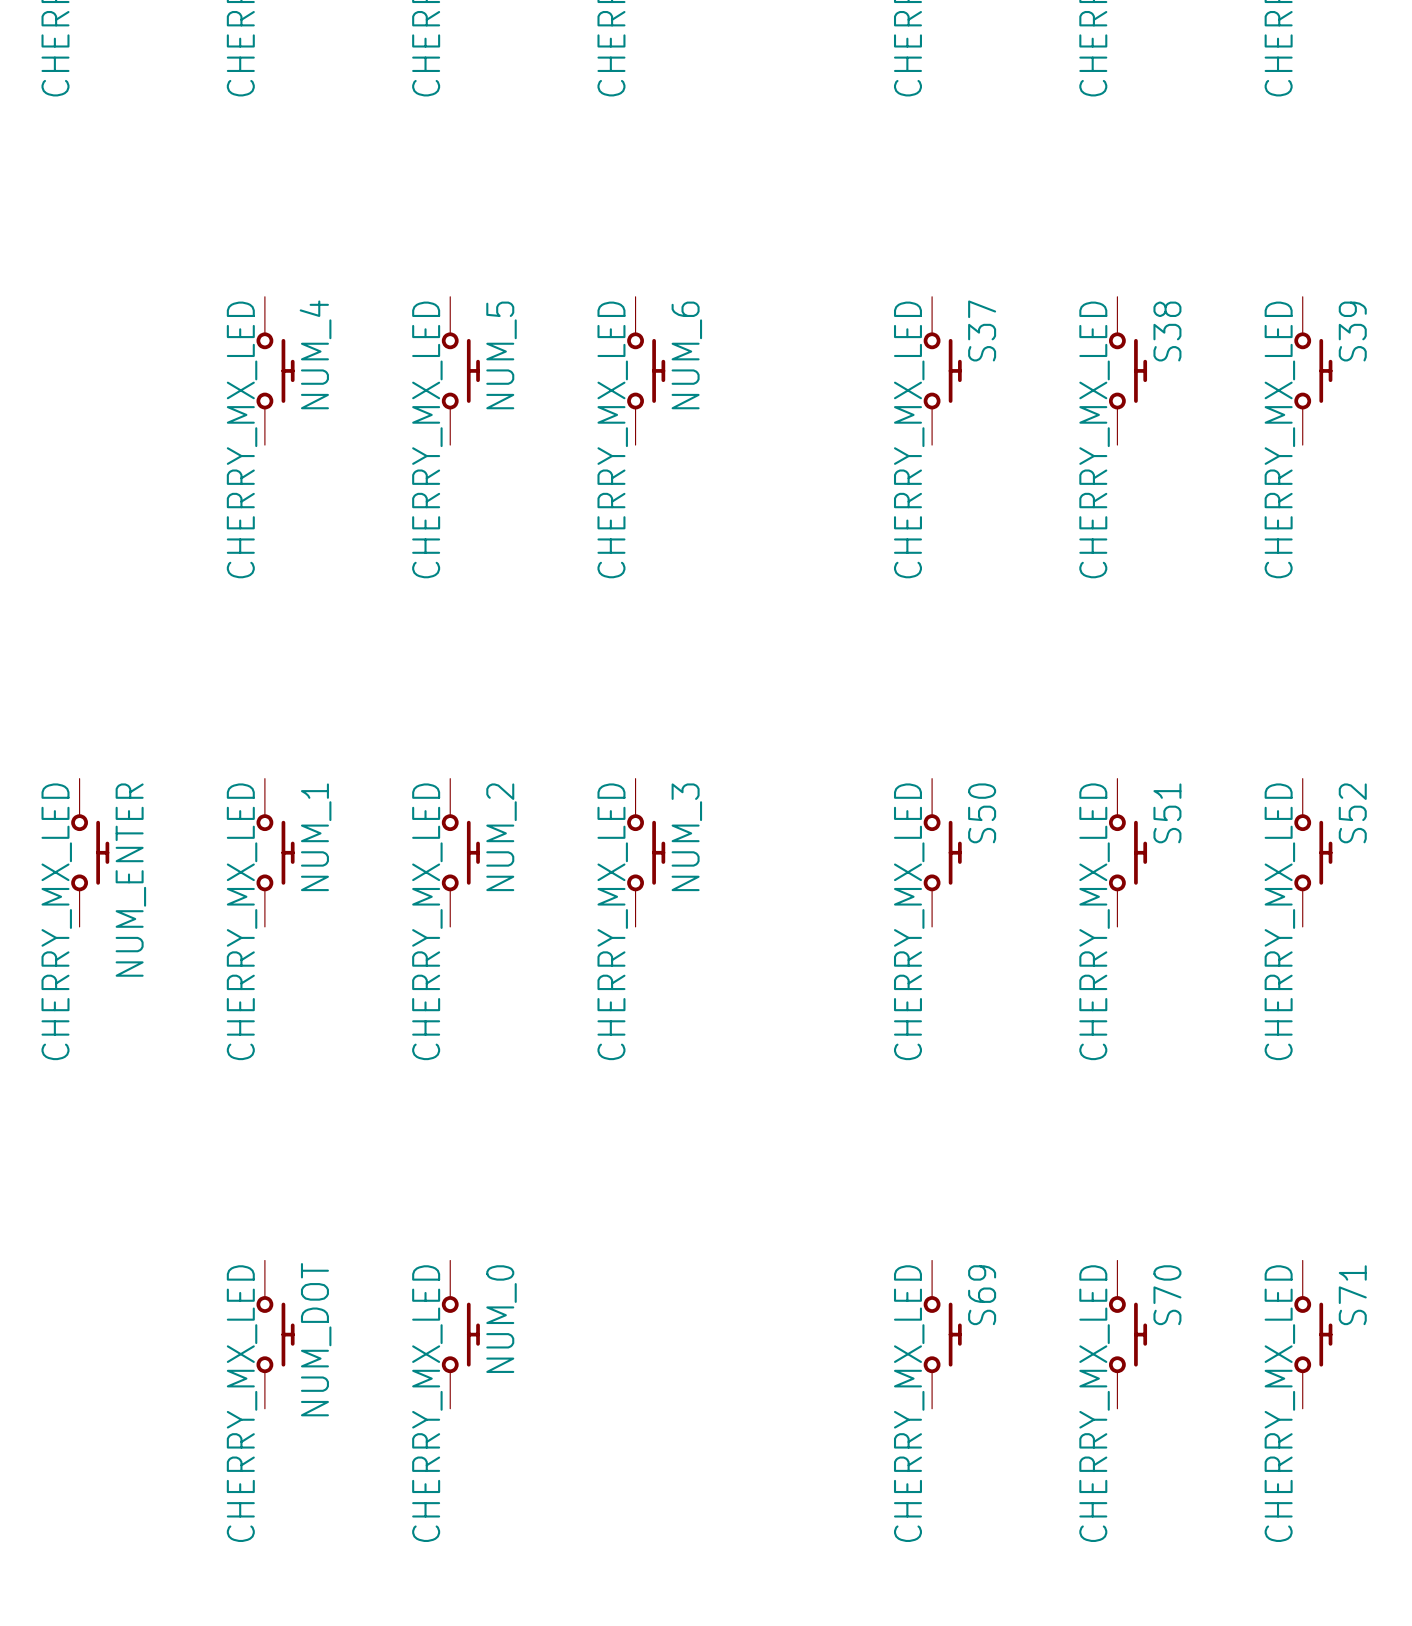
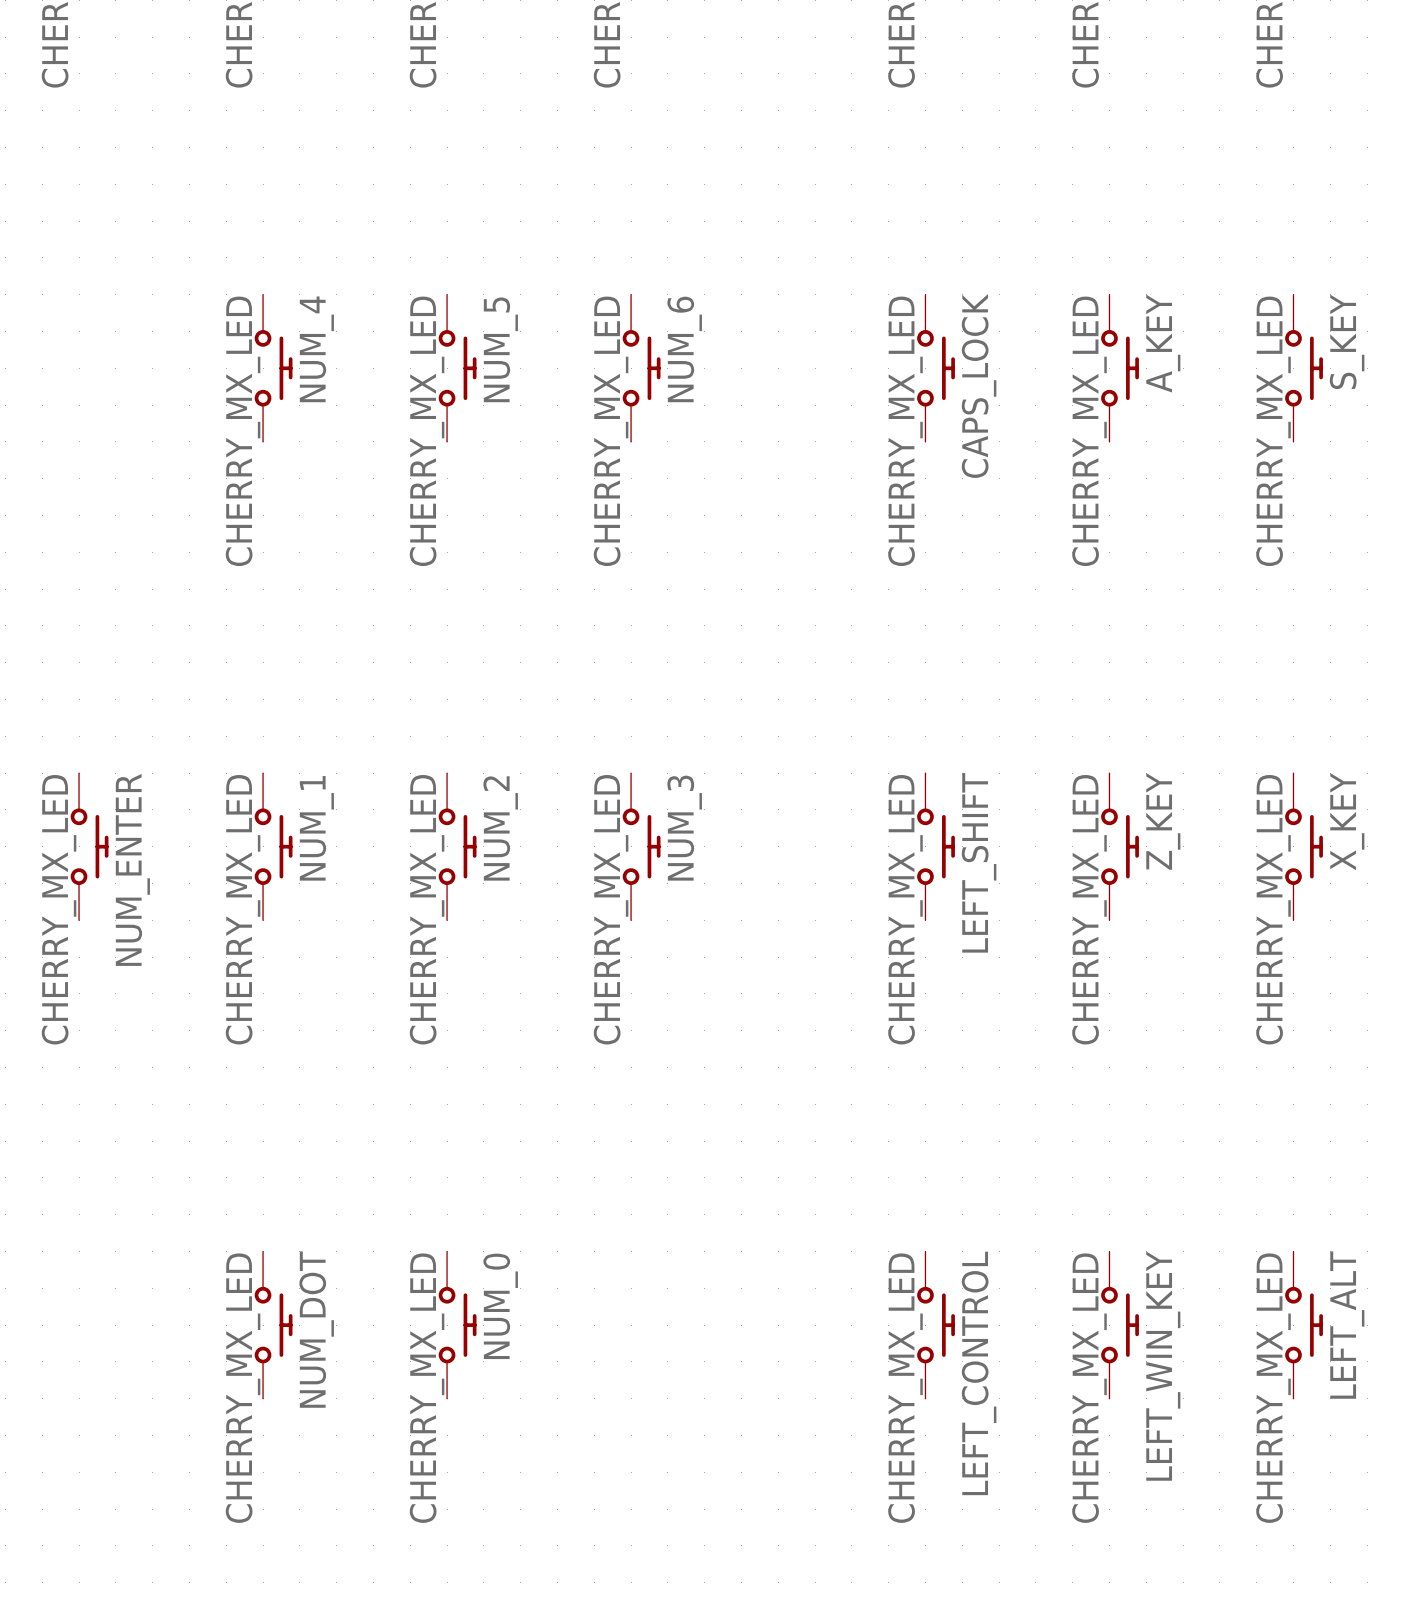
S37 name: S37 (982, 330) -> CAPS_LOCK (979, 385)
S38 name: S38 (1167, 331) -> A_KEY (1163, 343)
S39 name: S39 (1352, 331) -> S_KEY (1347, 341)
S50 name: S50 (982, 813) -> LEFT_SHIFT (979, 862)
S51 name: S51 (1167, 813) -> Z_KEY (1163, 821)
S52 name: S52 (1352, 813) -> X_KEY (1347, 821)
S69 name: S69 (982, 1295) -> LEFT_CONTROL (979, 1373)
S70 name: S70 (1167, 1295) -> LEFT_WIN_KEY (1163, 1366)
S71 name: S71 (1352, 1295) -> LEFT_ALT (1347, 1325)

